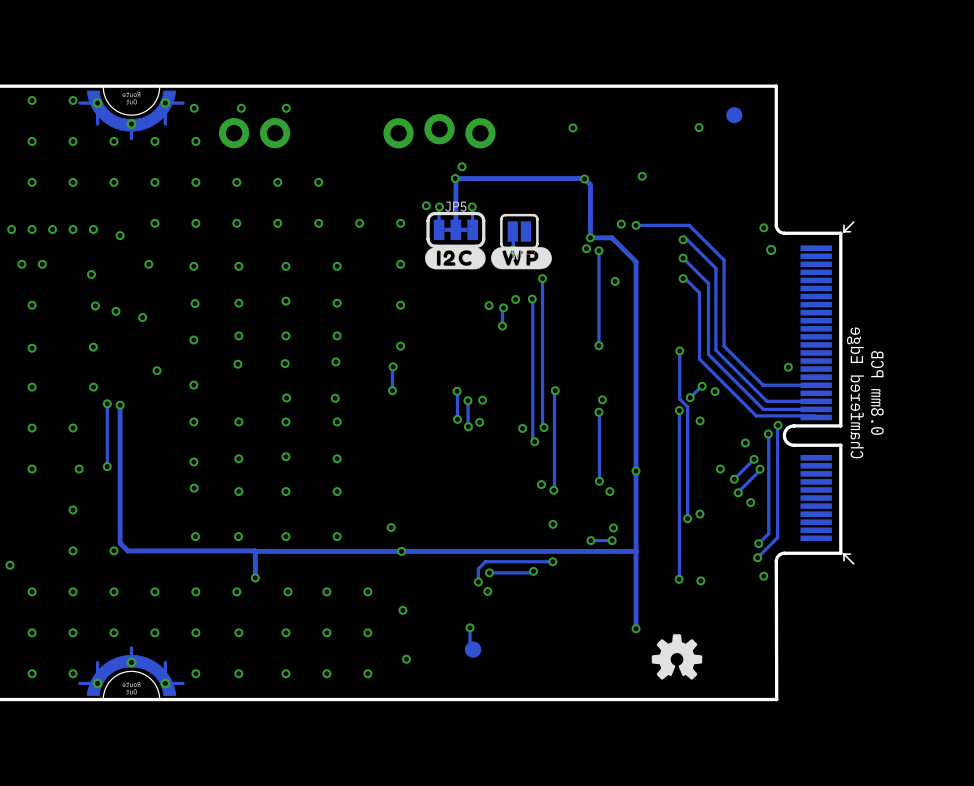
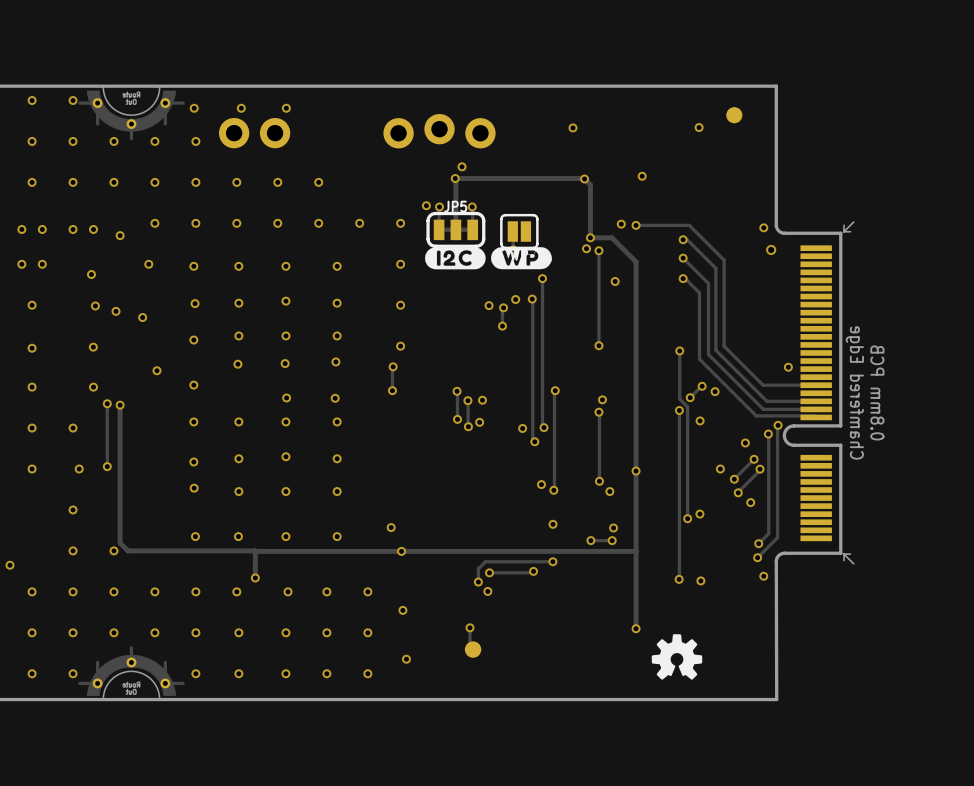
via: (11, 229) -> none
via: none -> (21, 229)
via: (32, 229) -> none
via: none -> (42, 229)
via: (52, 229) -> none

